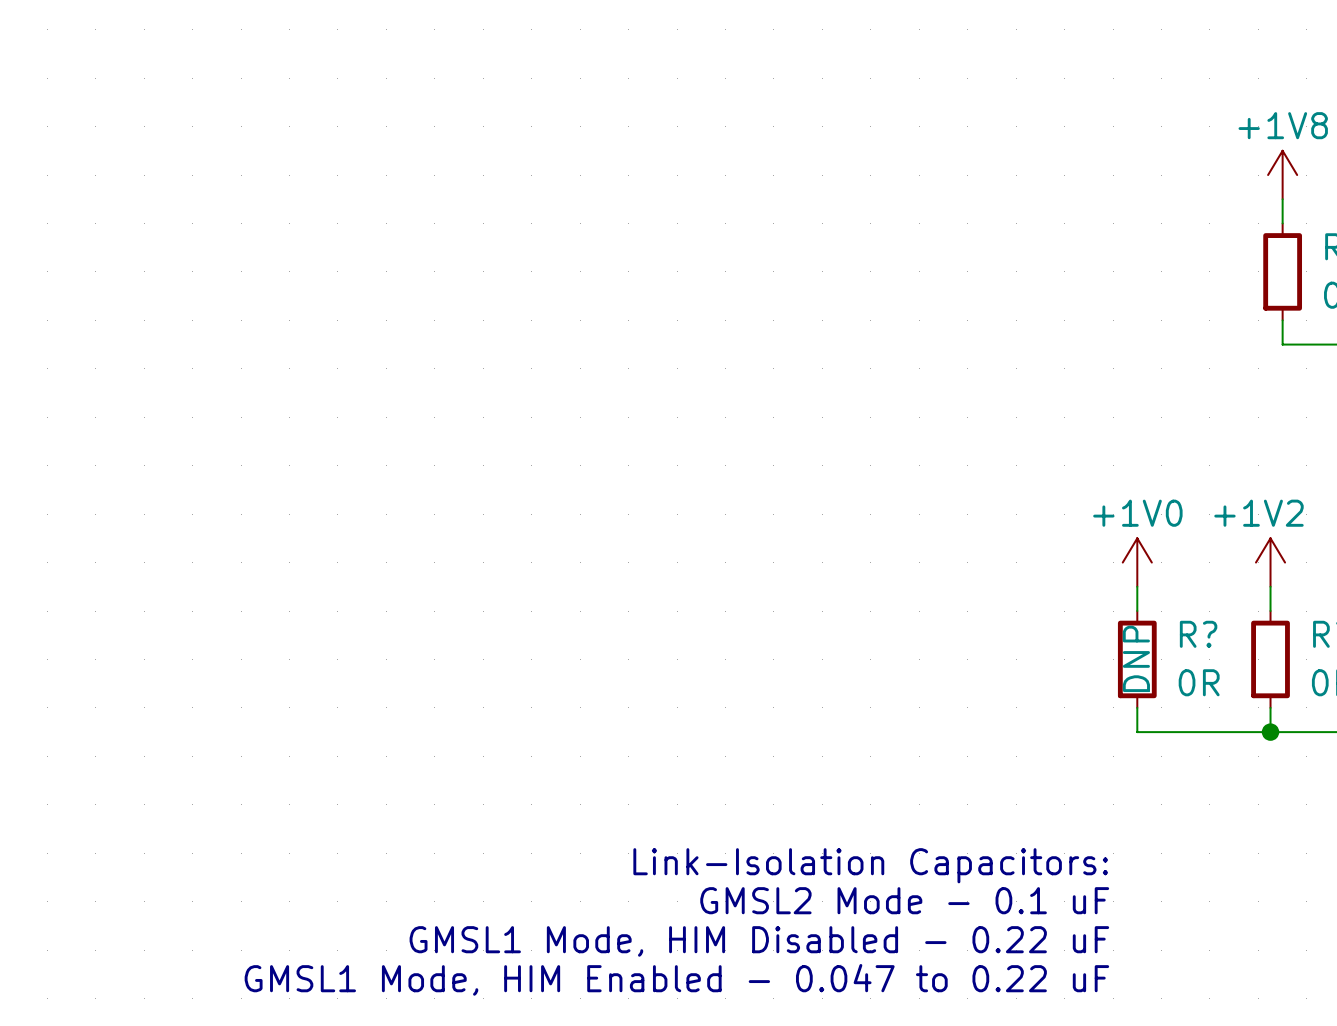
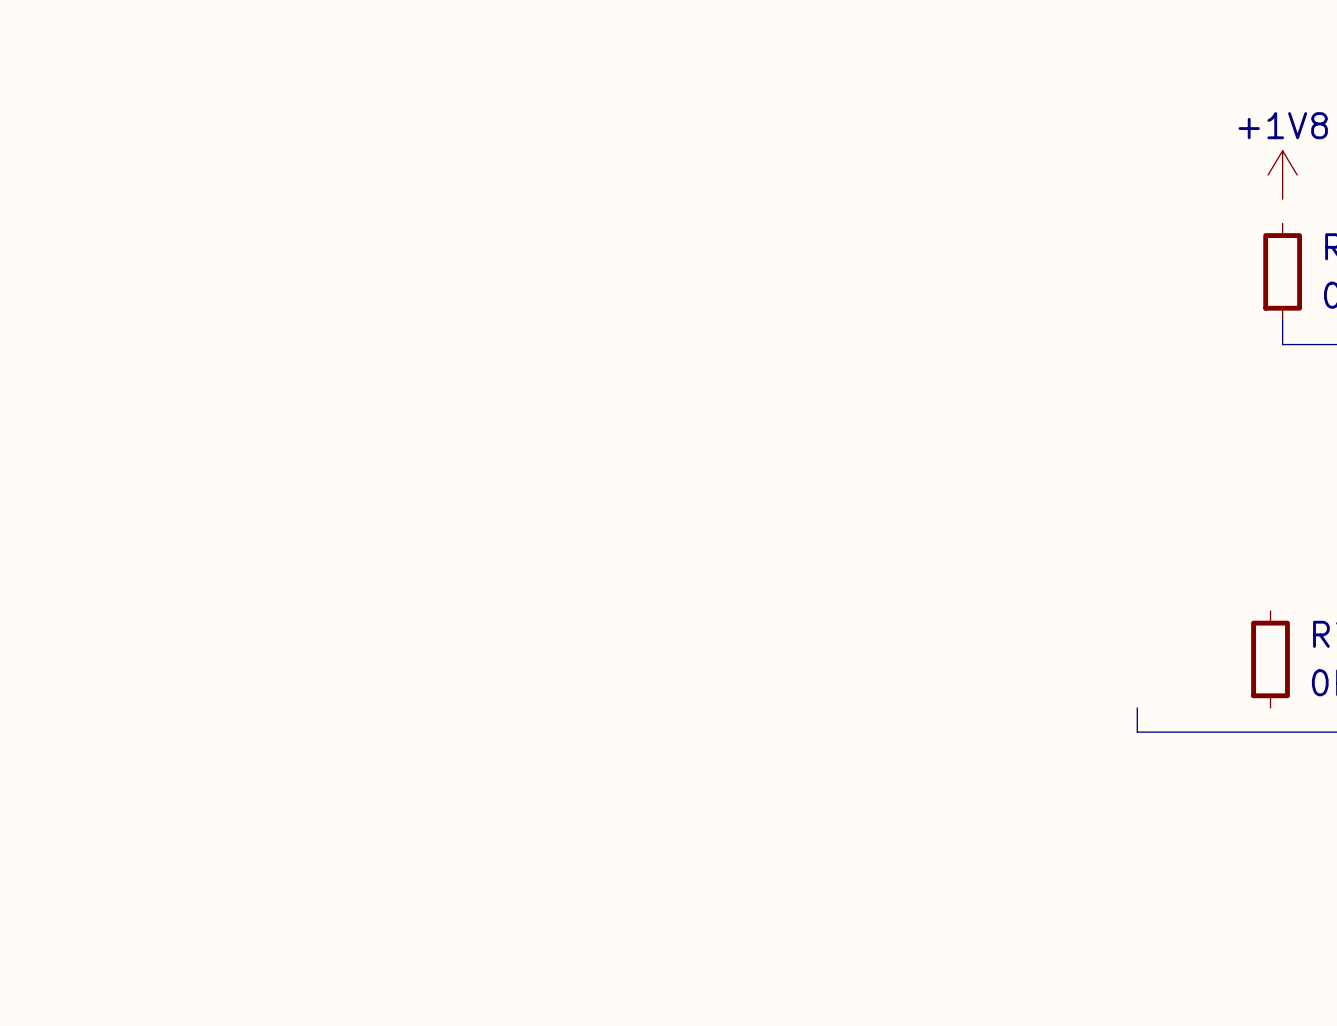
wire: (1282, 199) (1282, 223) -> none
power symbol: +1V0 (1137, 562) -> none
power symbol: +1V2 (1270, 562) -> none
wire: (1137, 586) (1137, 611) -> none
wire: (1270, 586) (1270, 611) -> none
R?: (1137, 659) -> none
wire: (1270, 707) (1270, 732) -> none
junction: (1270, 732) -> none
text: Link-Isolation Capacitors: (870, 865) -> none
text: GMSL2 Mode - 0.1 uF (904, 900) -> none
text: GMSL1 Mode, HIM Disabled - 0.22 uF (759, 941) -> none
text: GMSL1 Mode, HIM Enabled - 0.047 to 0.22 uF (676, 979) -> none

